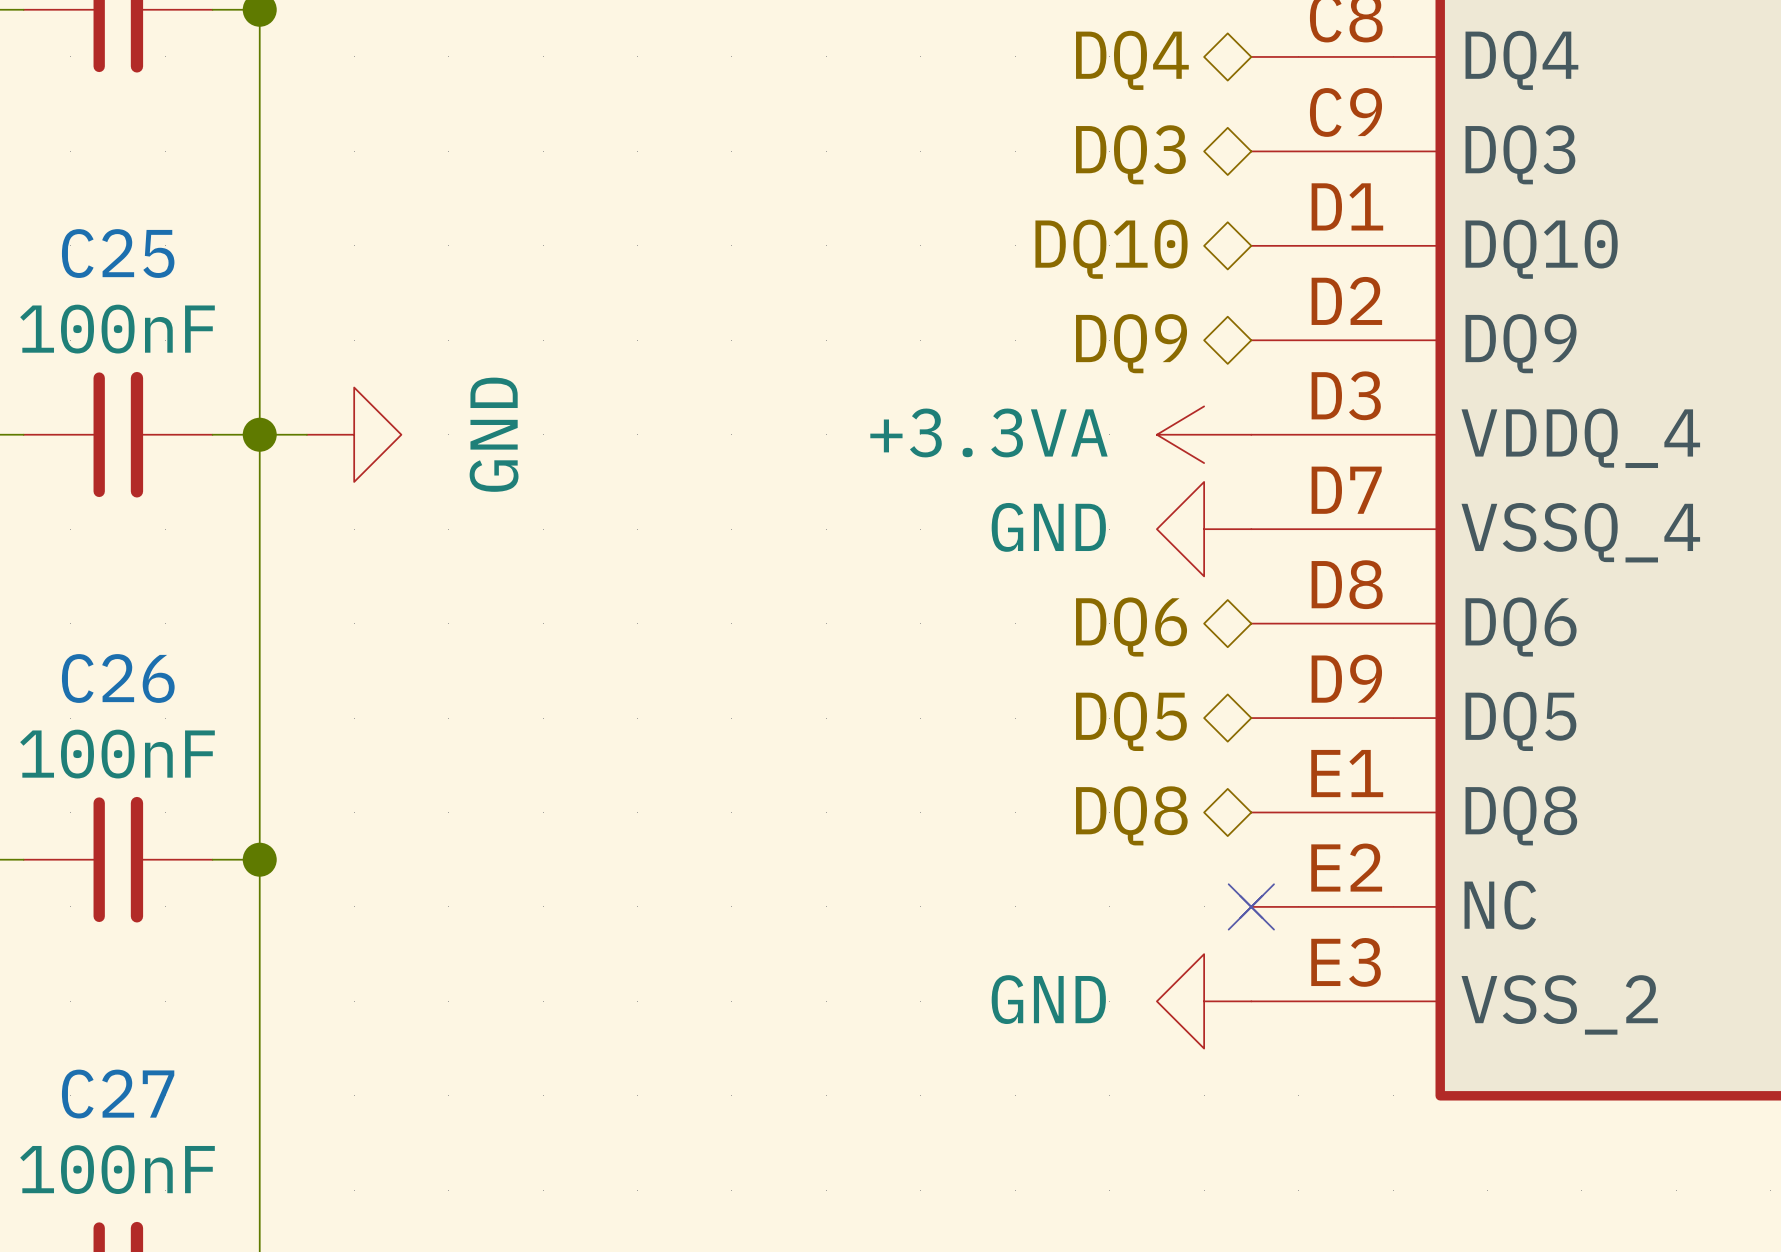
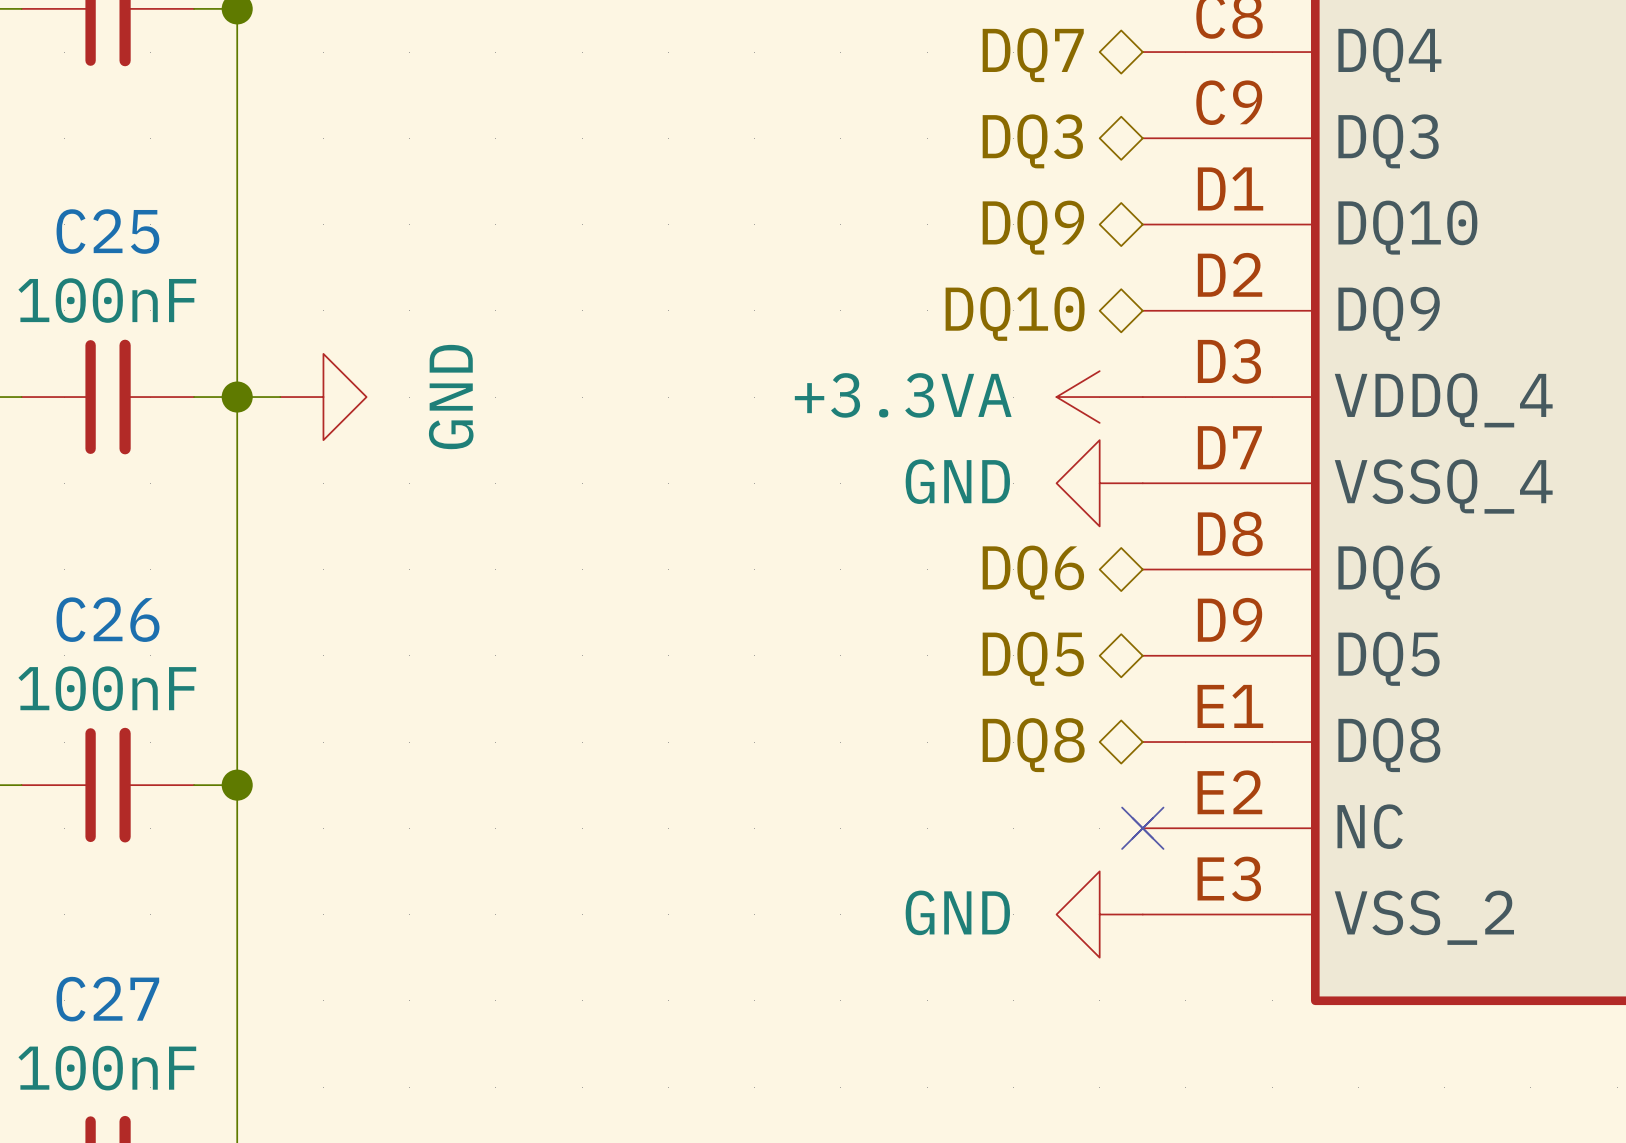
hierarchical label: DQ4 (1132, 60) -> DQ7 (1033, 55)
hierarchical label: DQ10 (1111, 249) -> DQ9 (1033, 227)
hierarchical label: DQ9 (1131, 343) -> DQ10 (1015, 313)

